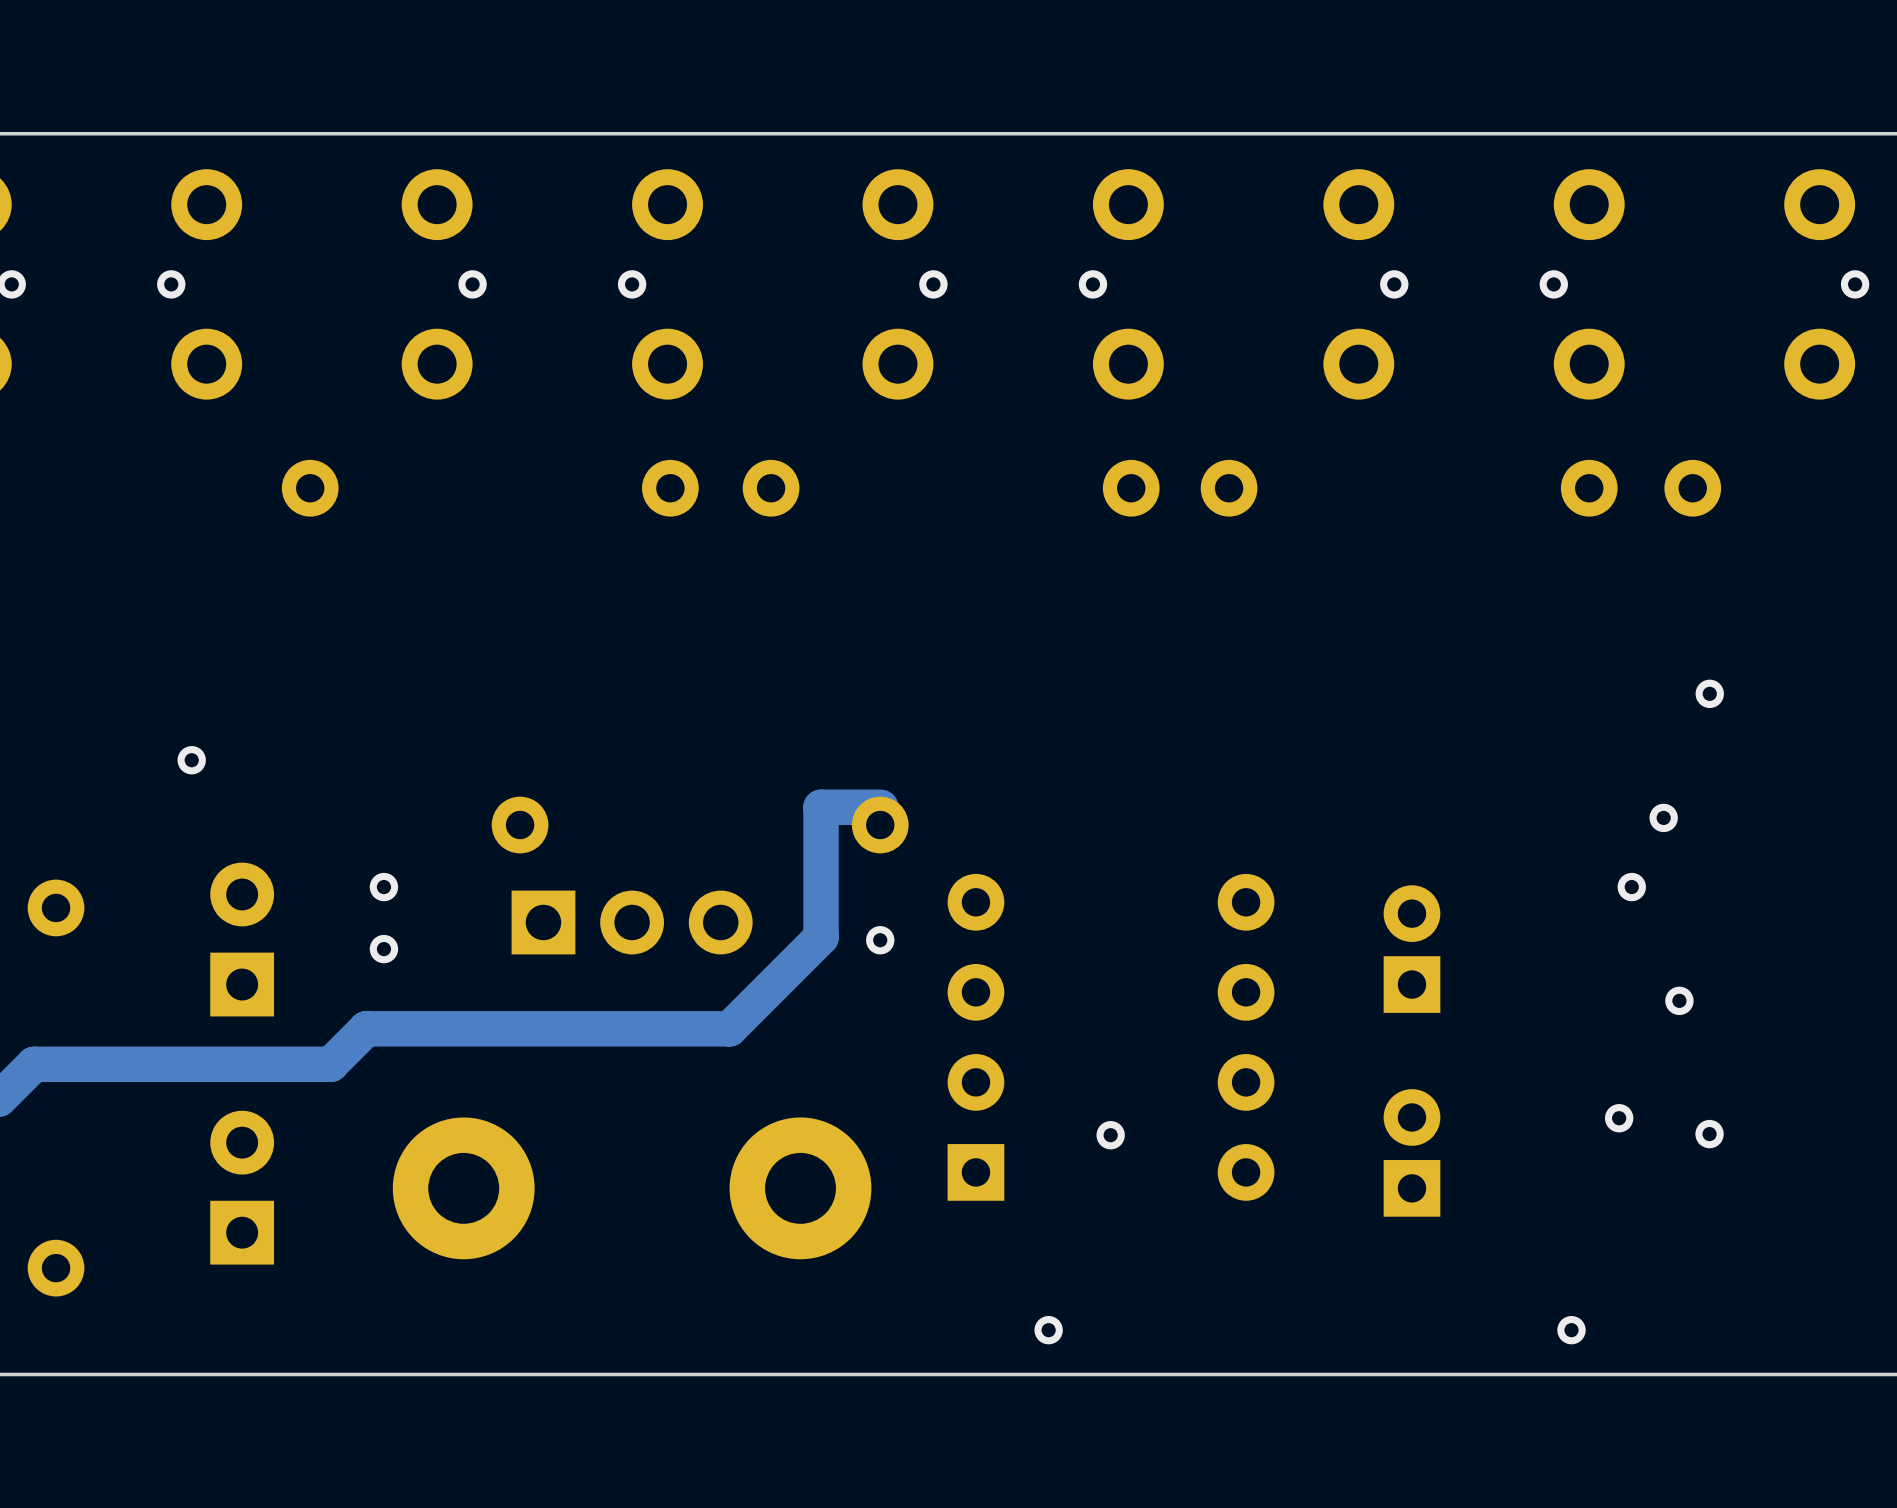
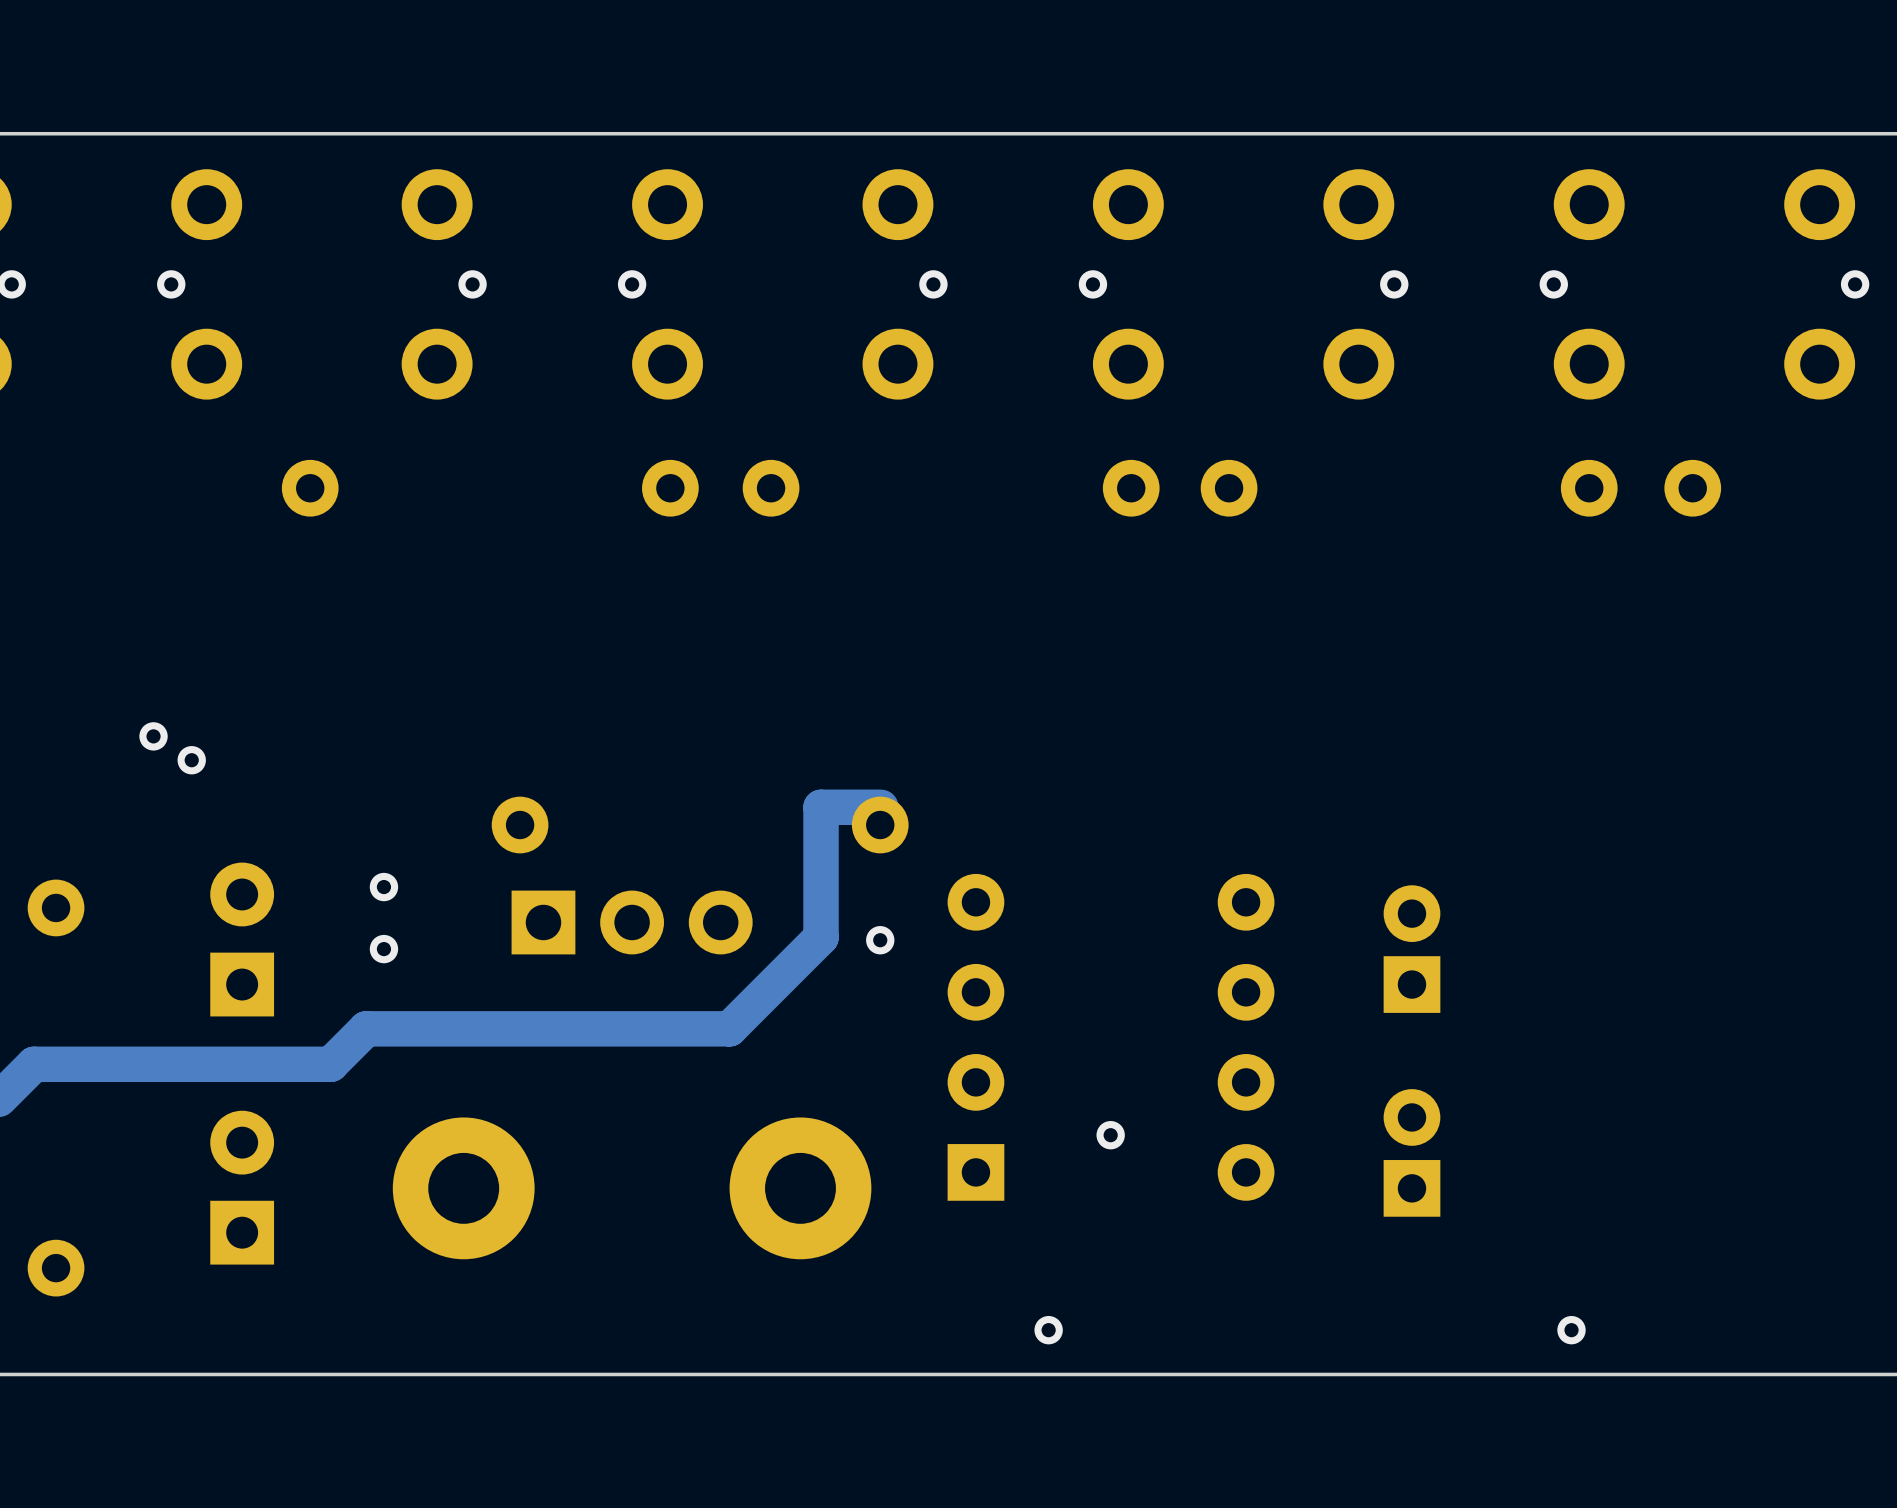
via: (1709, 693) -> none
via: none -> (153, 736)
via: (1663, 817) -> none
via: (1631, 887) -> none
via: (1679, 1000) -> none
via: (1619, 1118) -> none
via: (1709, 1134) -> none

